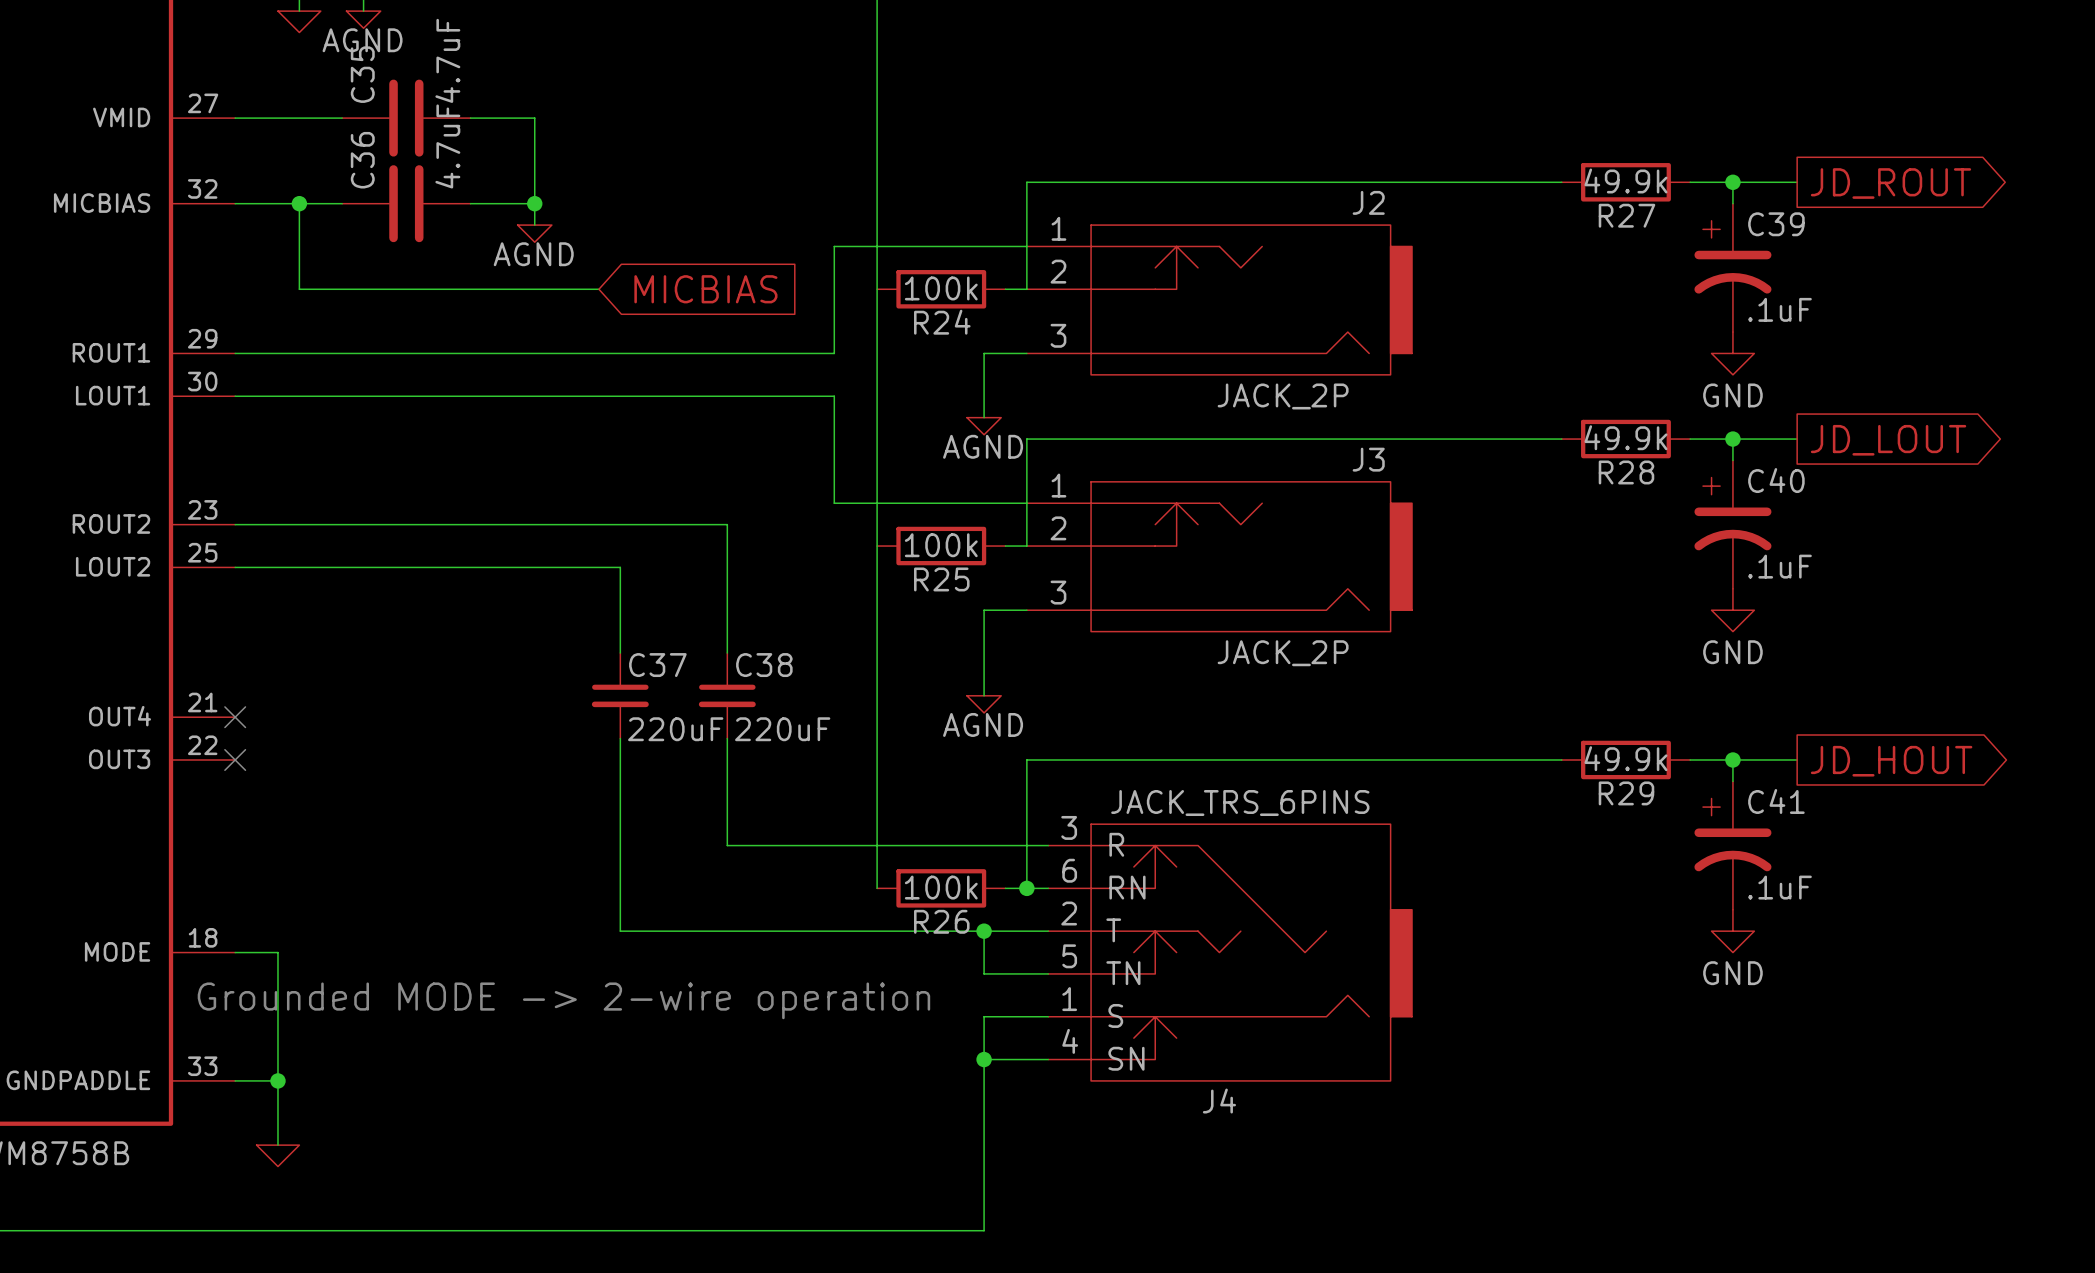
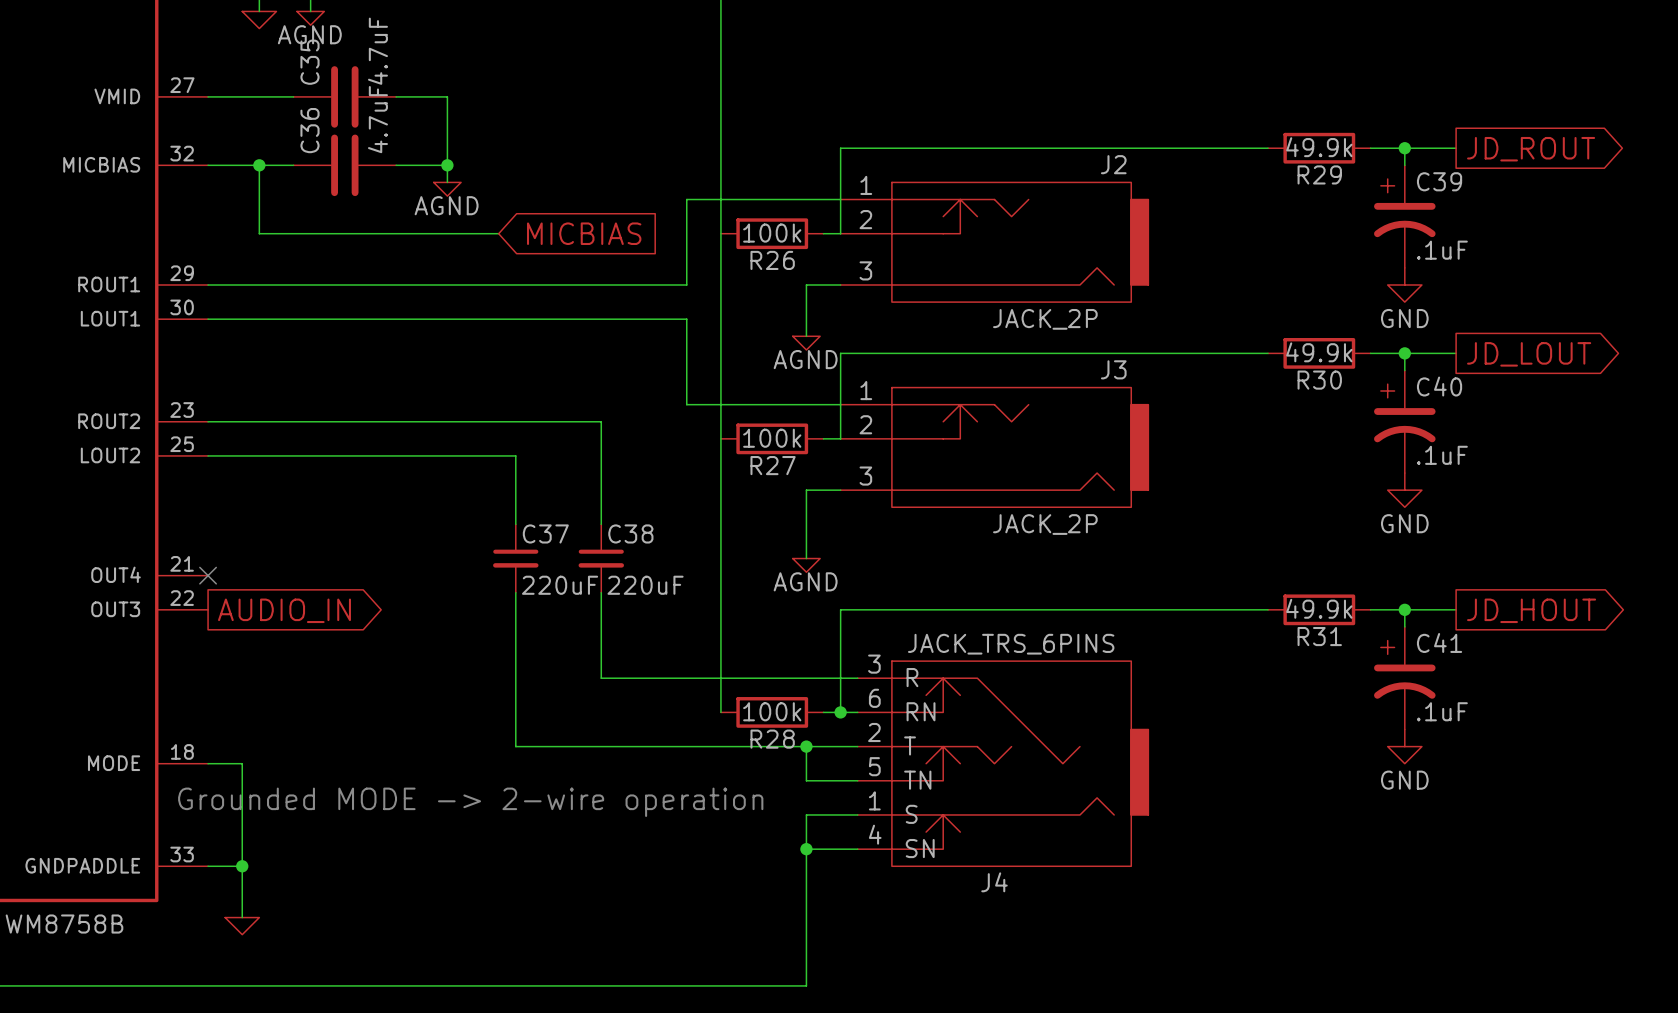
R27 name: R27 (1626, 215) -> R29 (1319, 174)
R24 name: R24 (942, 322) -> R26 (772, 260)
R28 name: R28 (1626, 472) -> R30 (1319, 380)
R25 name: R25 (941, 579) -> R27 (773, 465)
no-connect mark: (235, 759) -> none
global label: none -> AUDIO_IN (284, 610)
R29 name: R29 (1626, 793) -> R31 (1319, 636)
R26 name: R26 (941, 921) -> R28 (772, 739)

